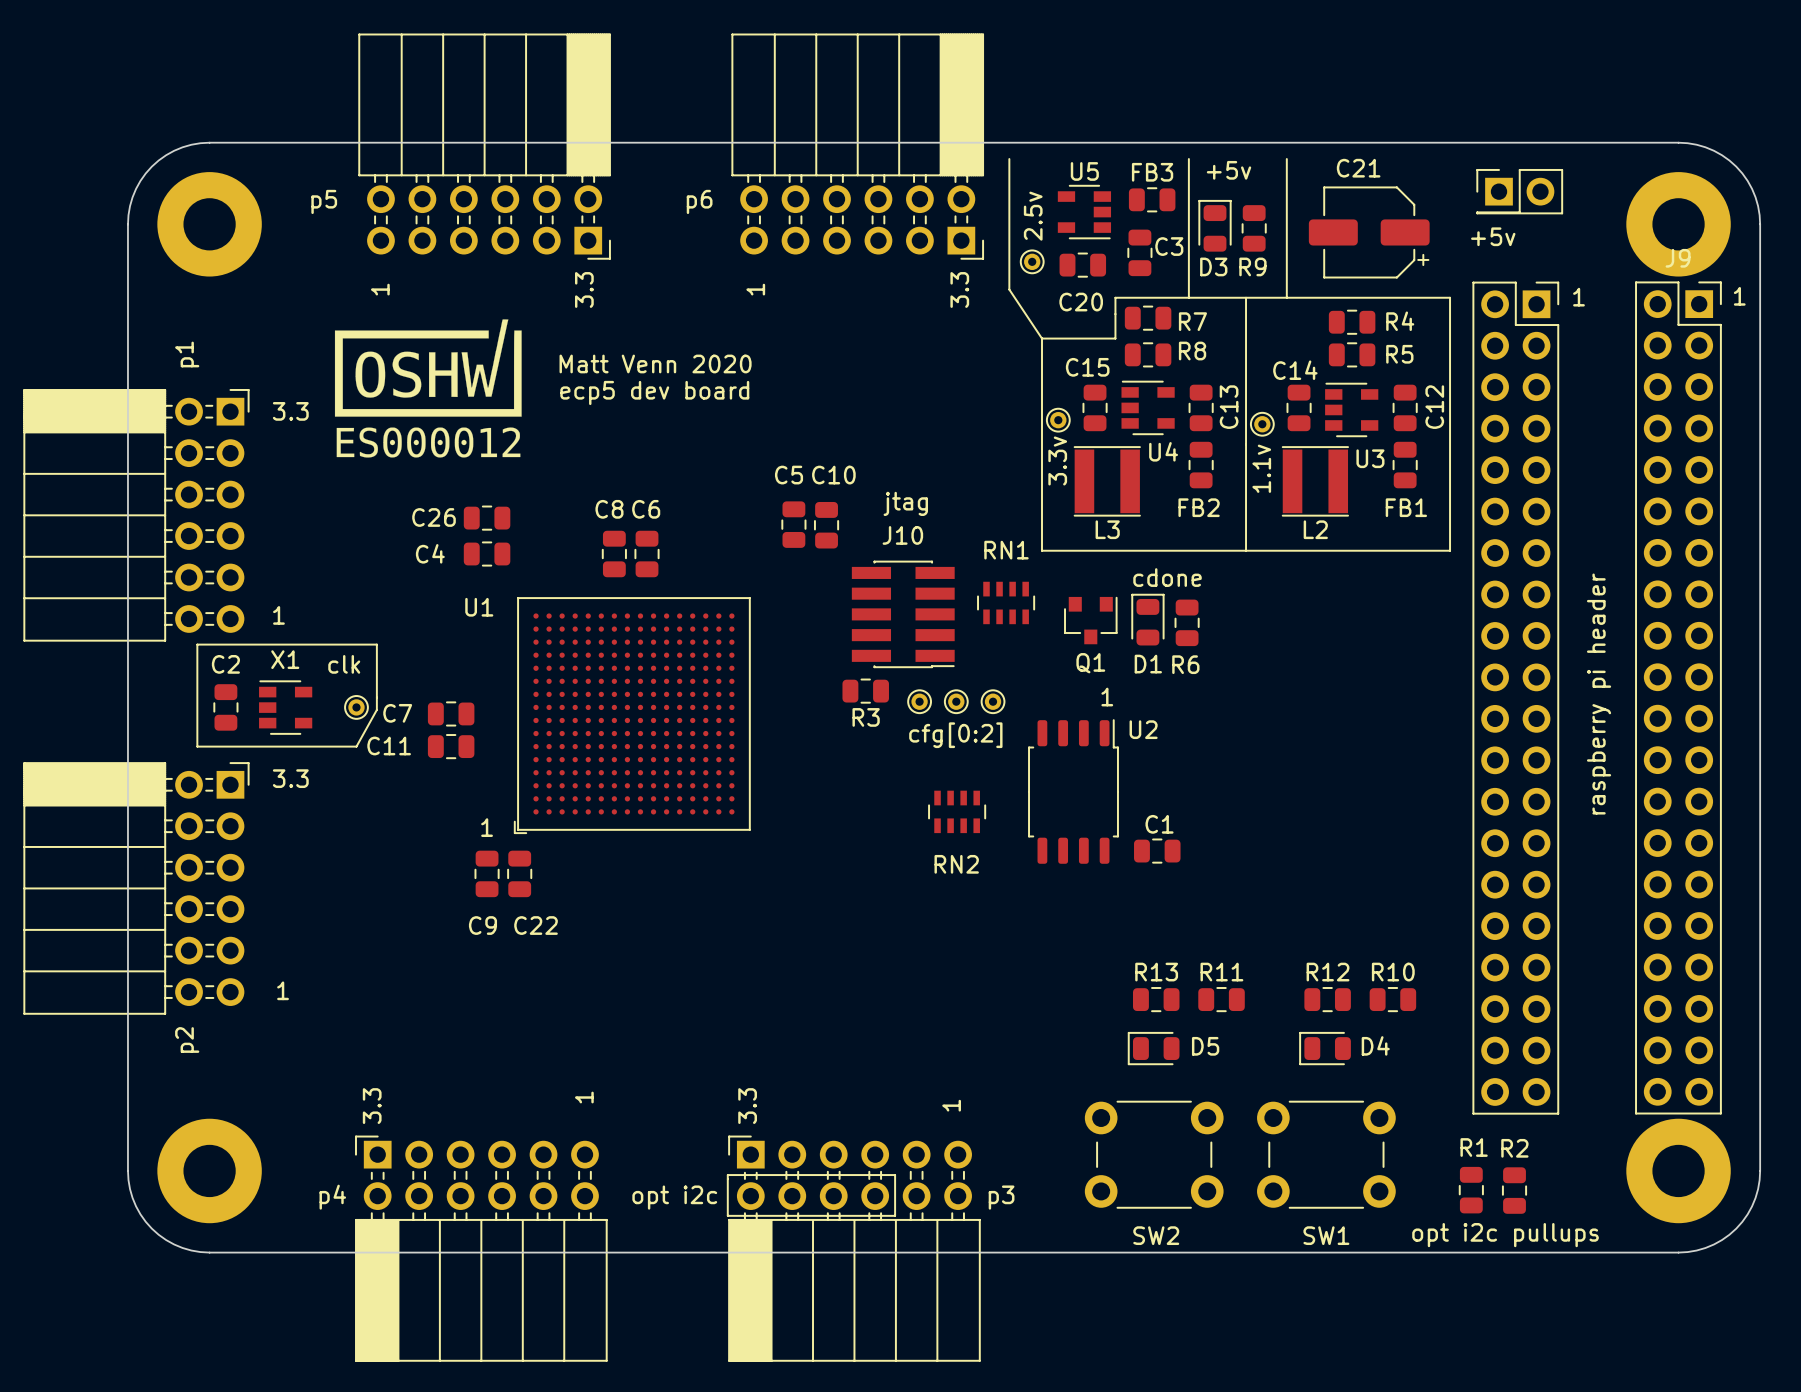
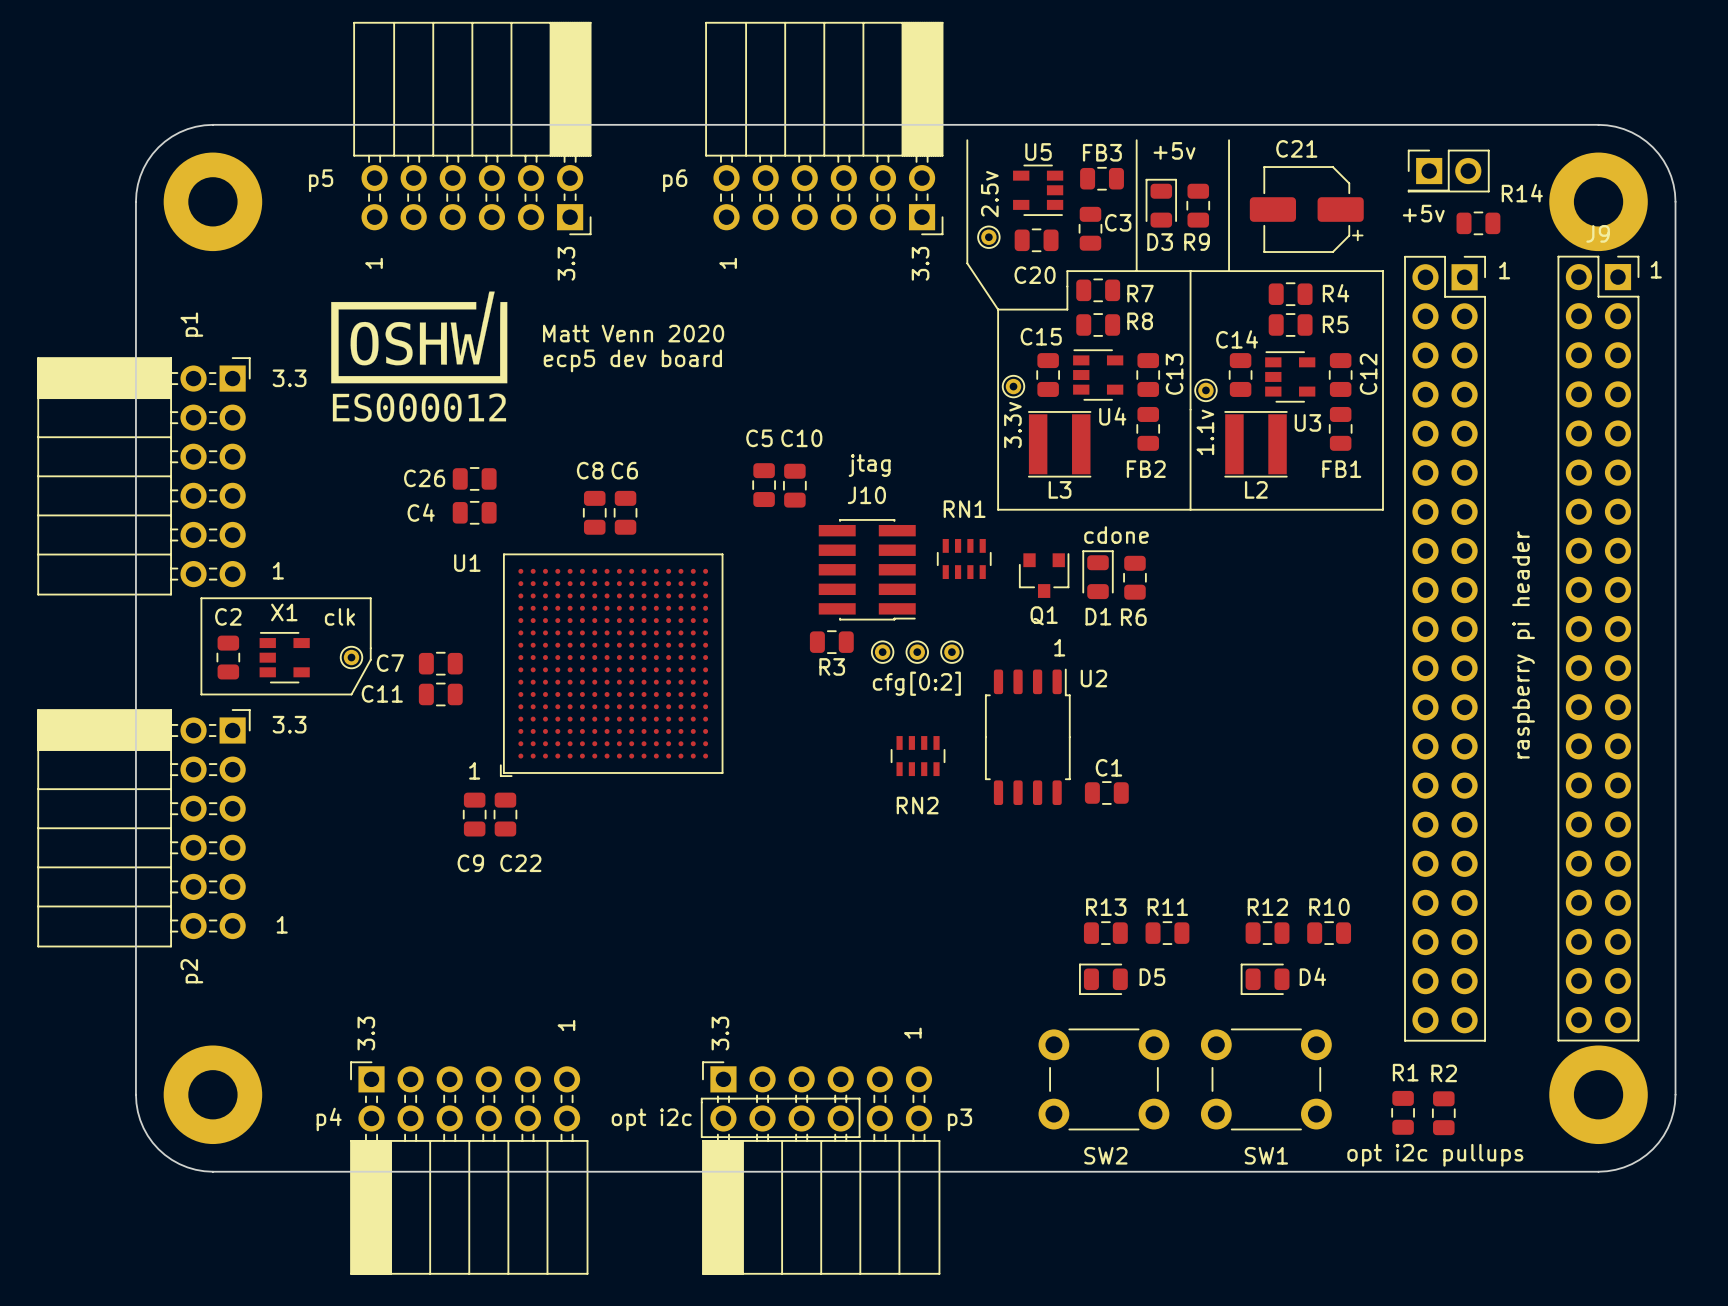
R14: none -> (1478, 223)

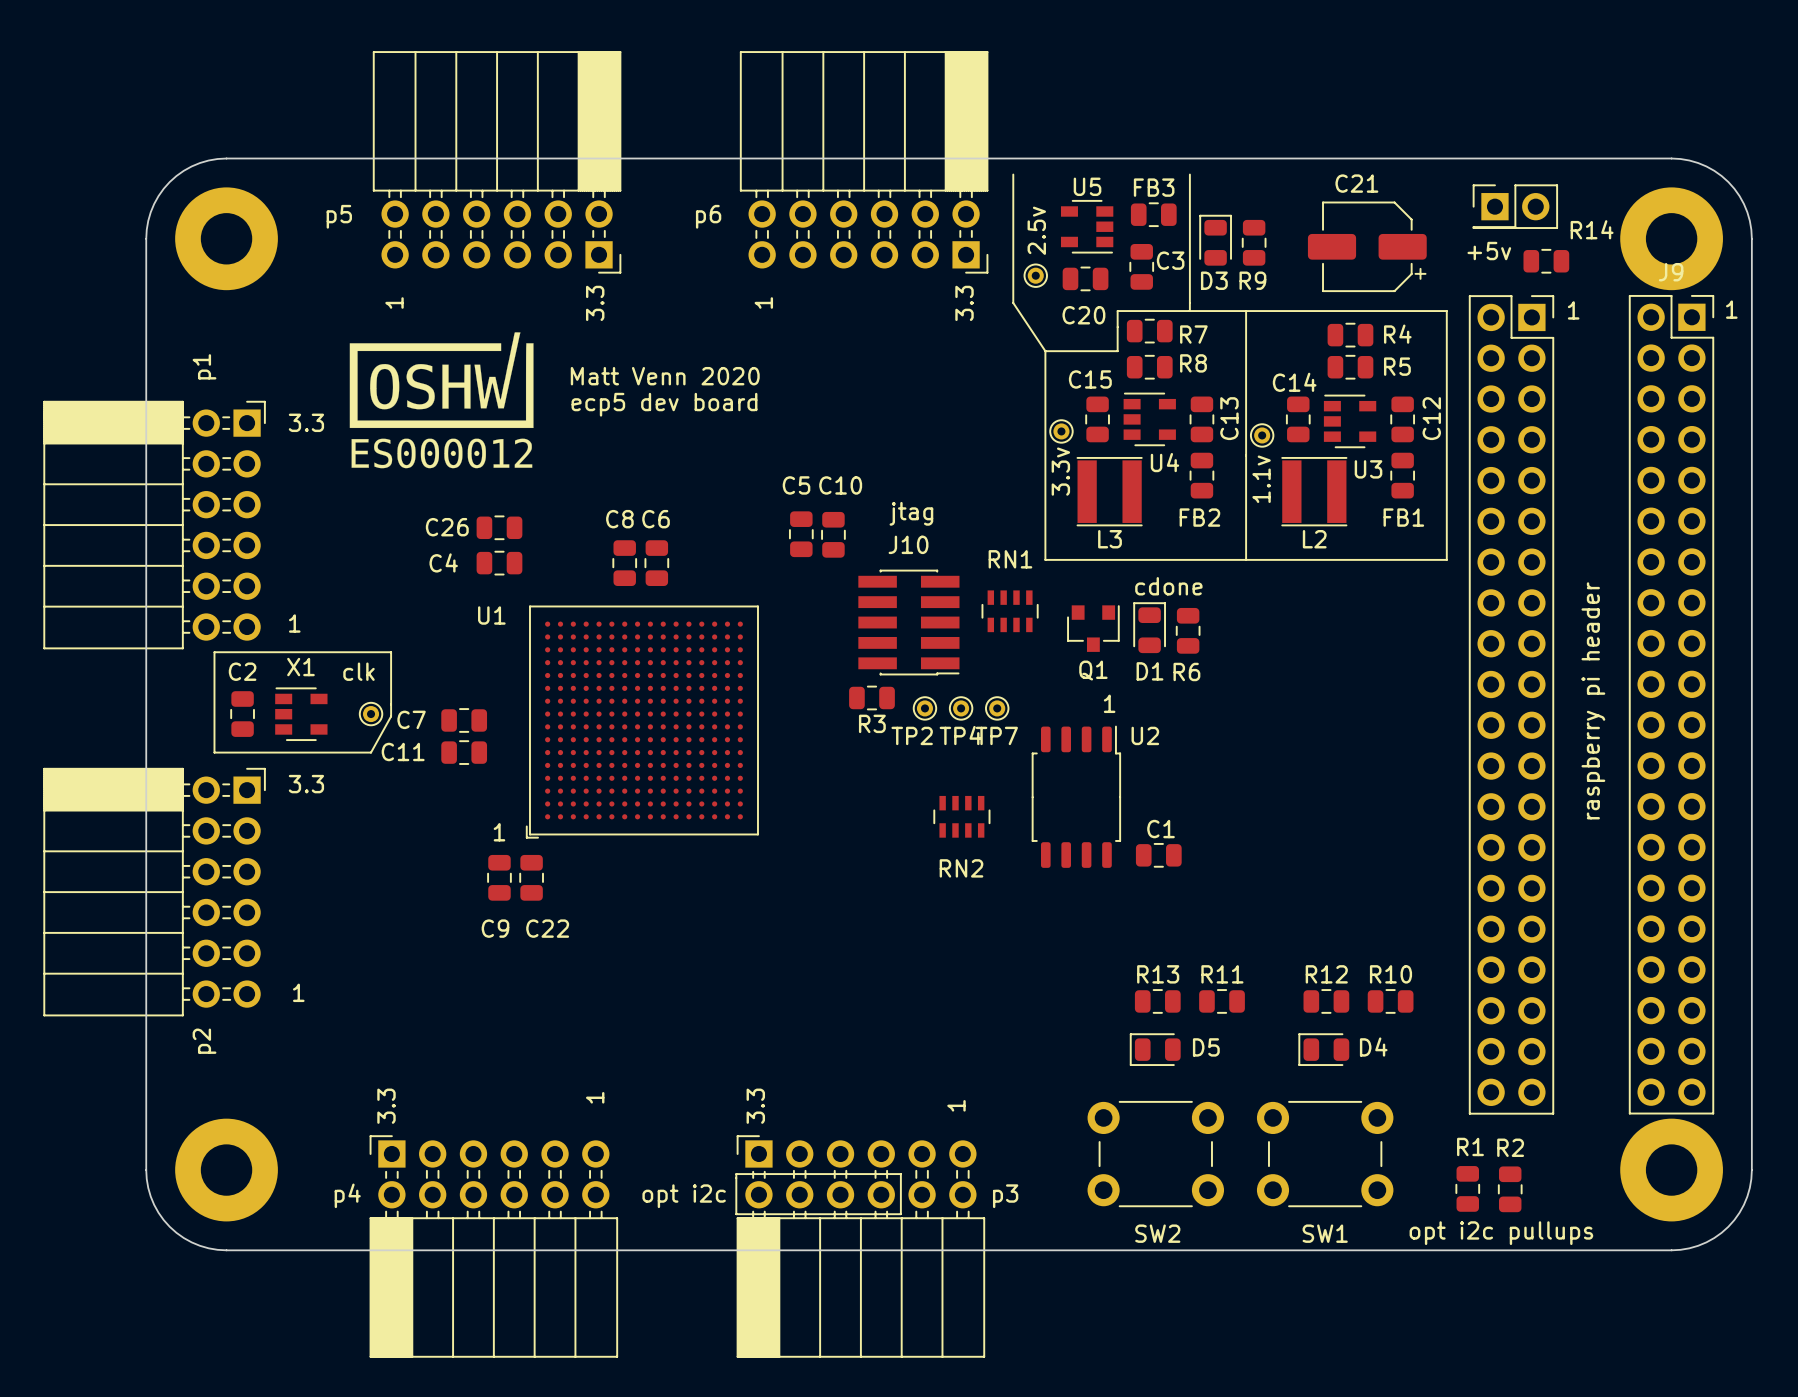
line: (1229, 140) (1229, 271) -> none
text: +5v (1174, 150) -> none
TP2 name: none -> TP2 (912, 735)
TP4 name: none -> TP4 (960, 735)
TP7 name: none -> TP7 (996, 735)
text: cfg[0:2] (916, 683) -> none

